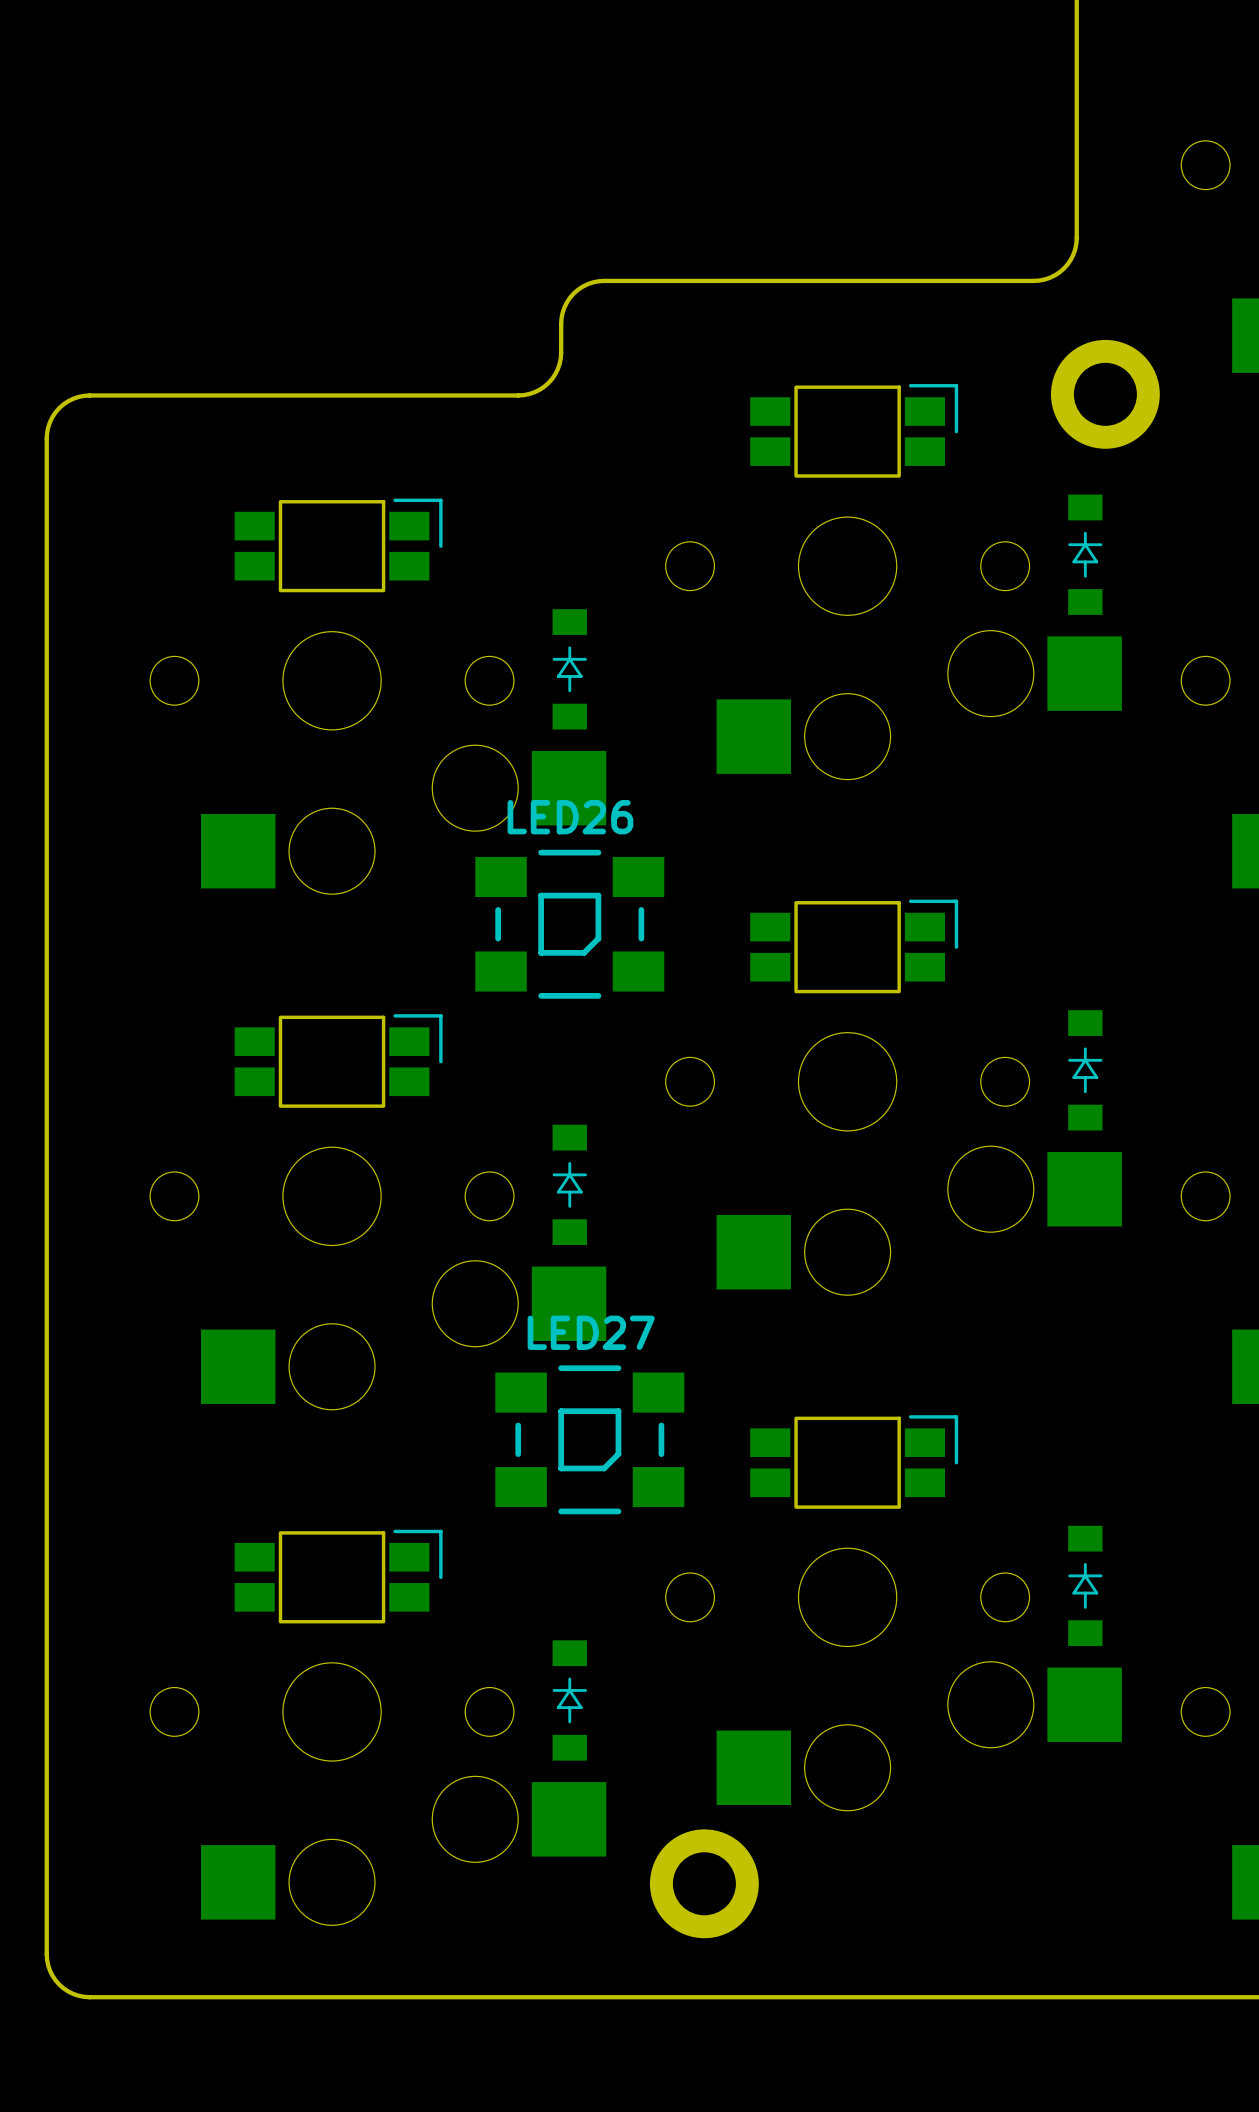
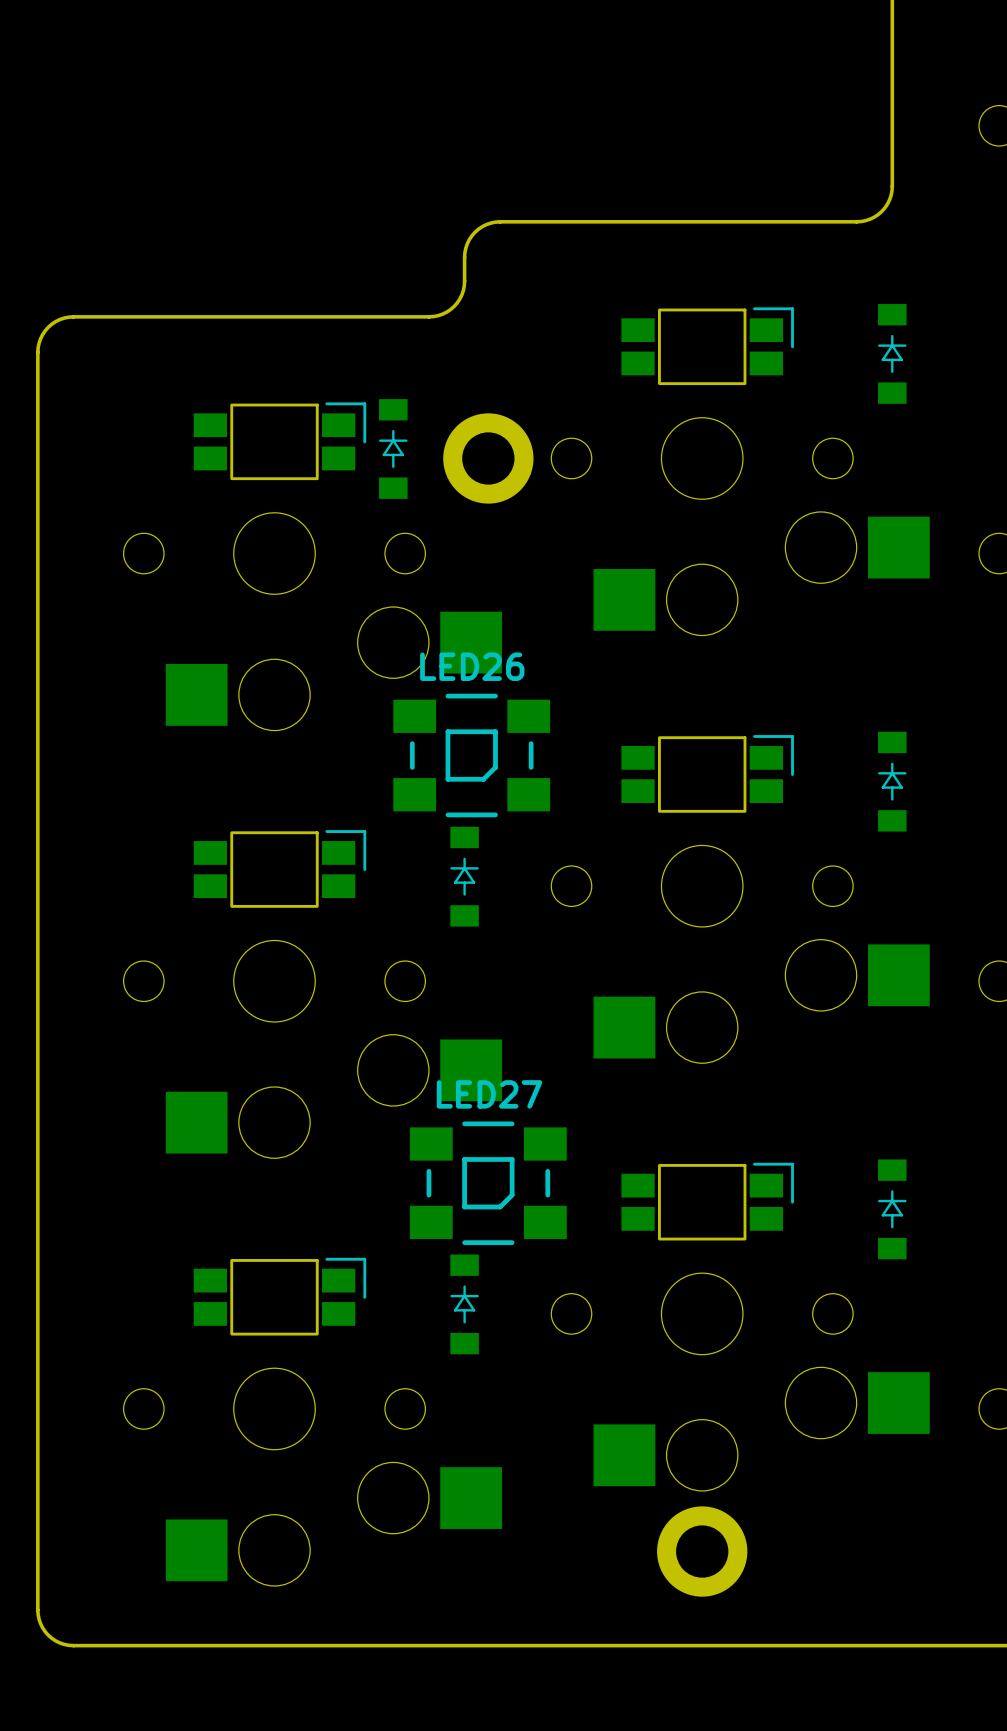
part position: (1105, 394) -> (488, 458)
part position: (1085, 554) -> (892, 353)
part position: (569, 669) -> (393, 448)
part position: (1085, 1070) -> (892, 781)
part position: (569, 1184) -> (464, 876)
part position: (1085, 1585) -> (892, 1209)
part position: (569, 1700) -> (464, 1304)
part position: (704, 1883) -> (702, 1551)

